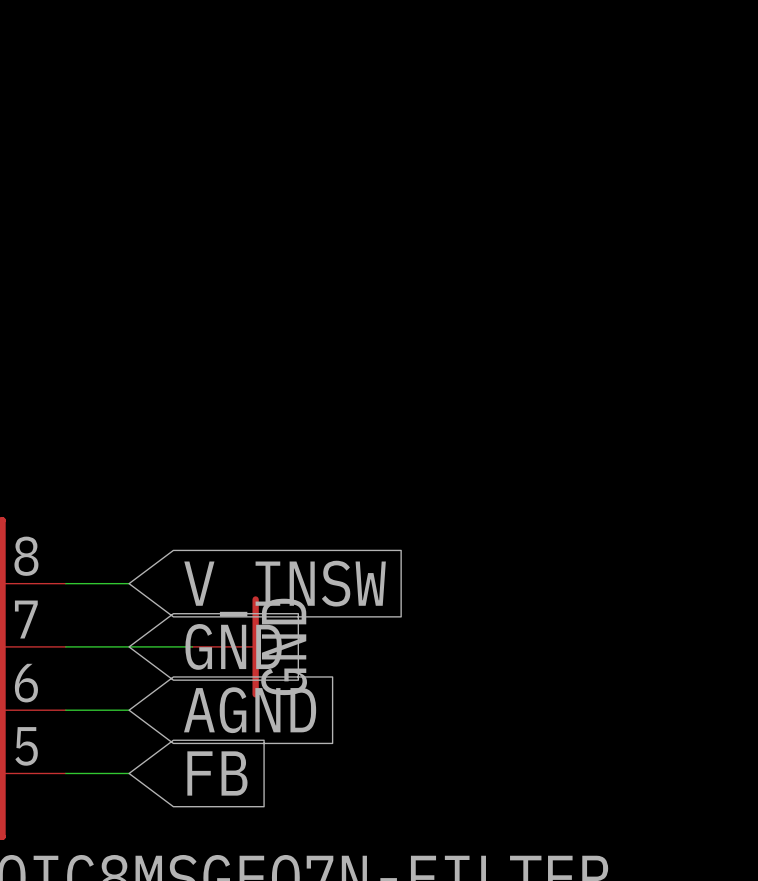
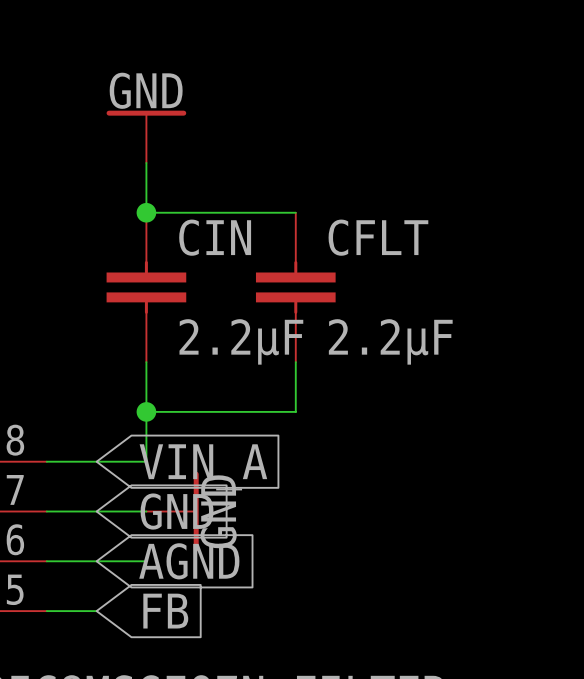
power symbol: none -> GND (146, 136)
wire: none -> (146, 162) (146, 212) (295, 212)
junction: none -> (146, 212)
CIN: none -> 2.2µF (146, 287)
CFLT: none -> 2.2µF (295, 287)
wire: none -> (146, 362) (146, 461) (96, 461)
wire: none -> (295, 362) (295, 411) (146, 411)
junction: none -> (146, 411)
global label: V_INSW (285, 588) -> VIN_A (203, 467)
wire: none -> (96, 561) (146, 561)

